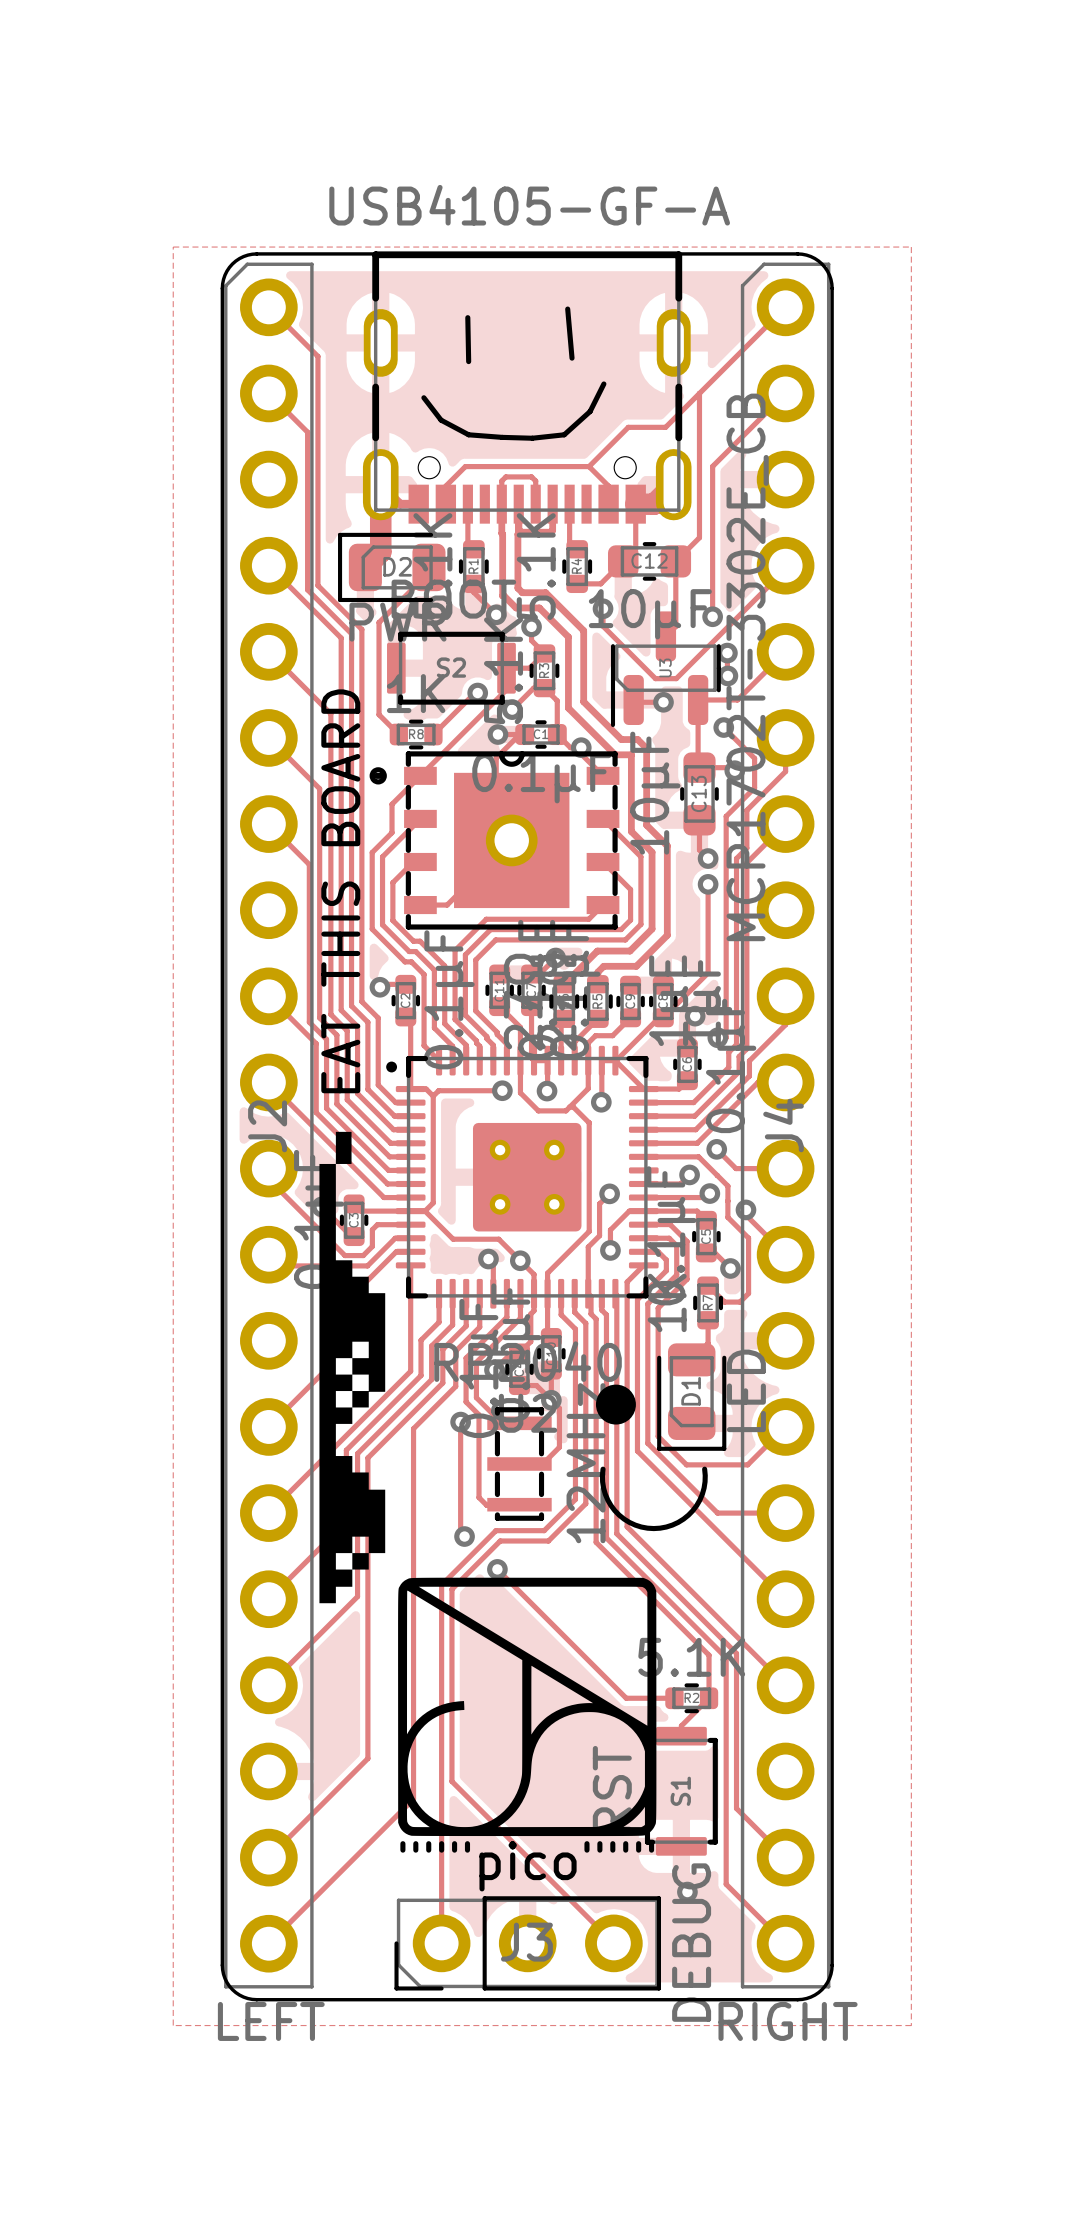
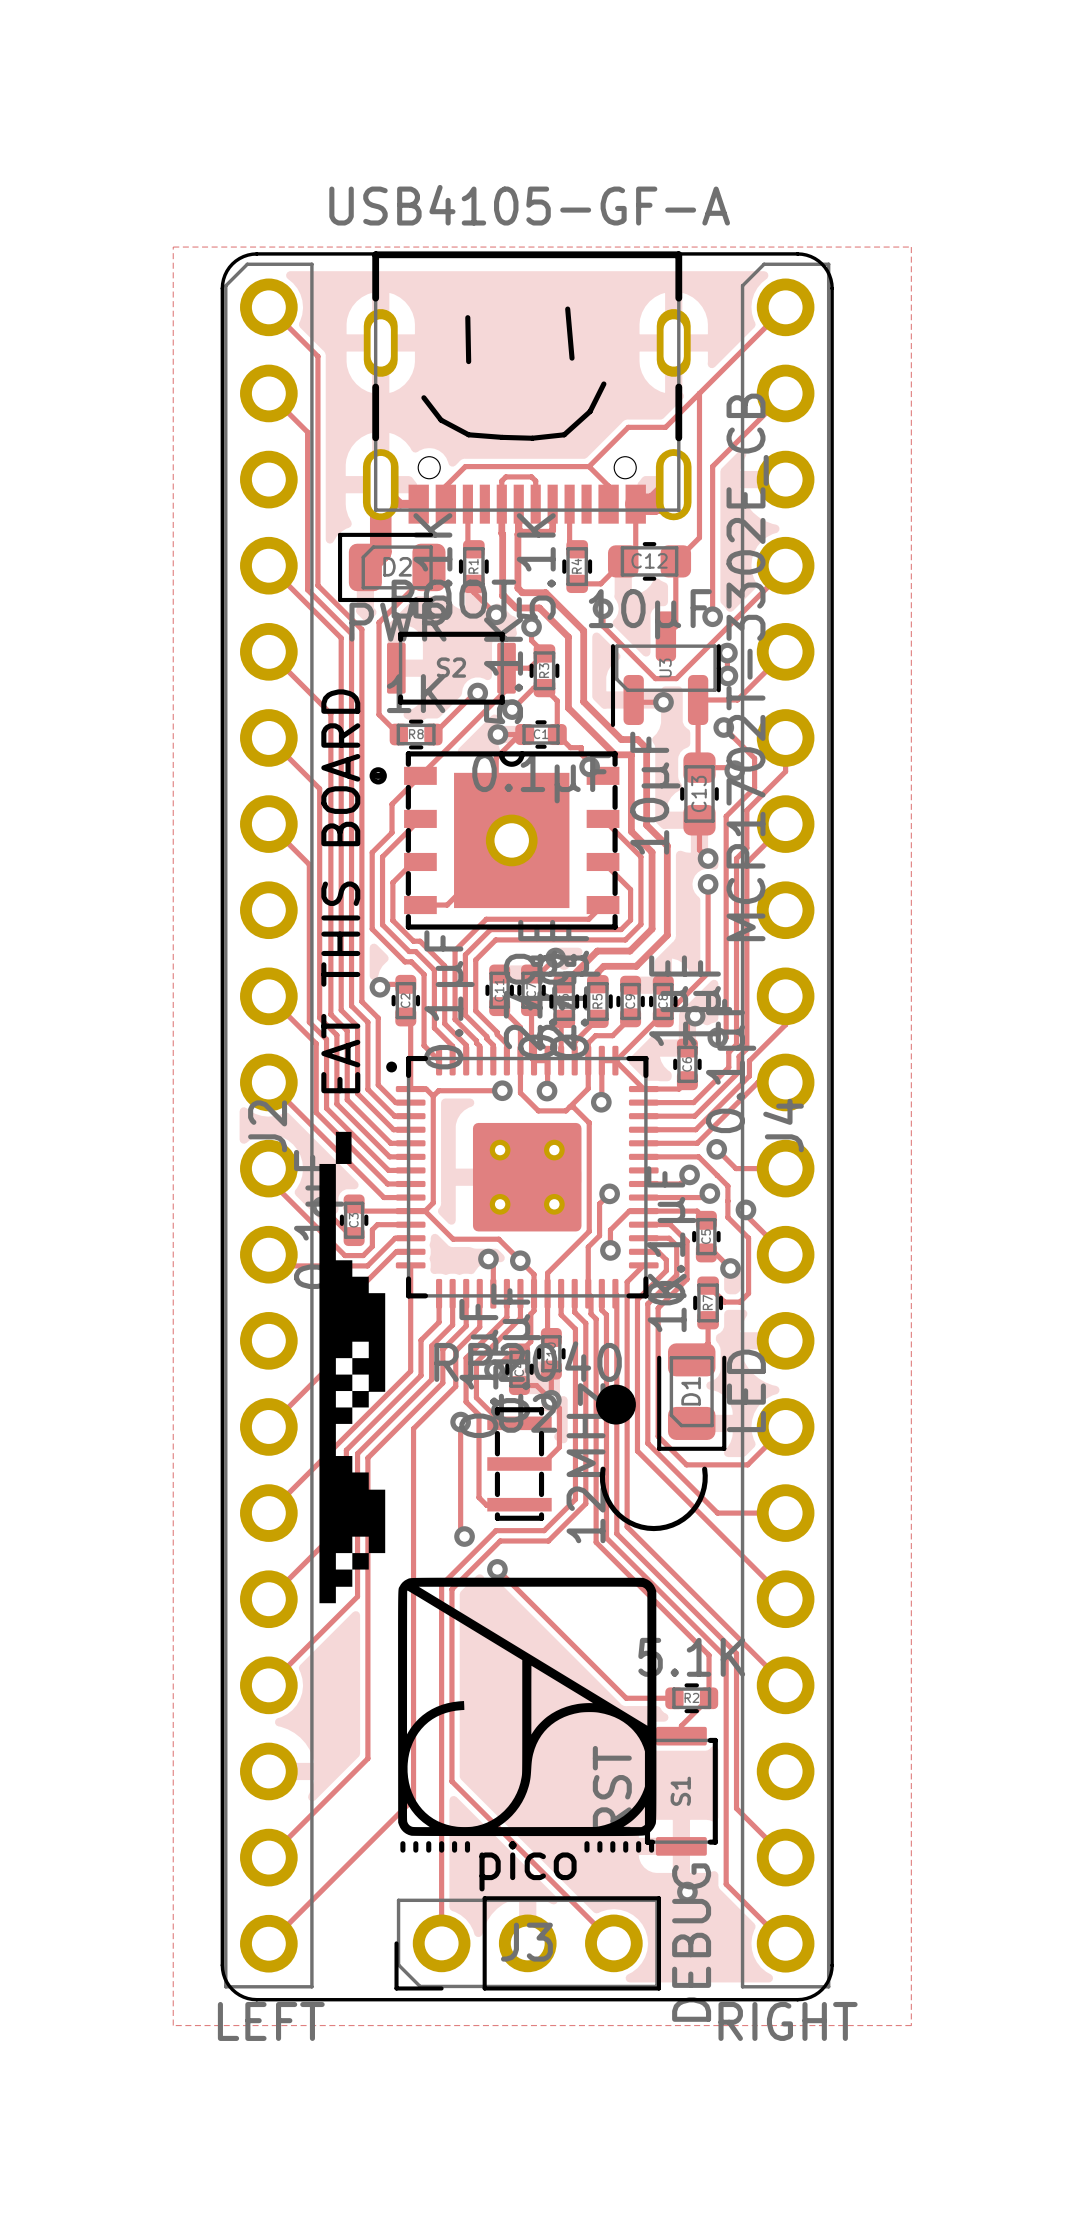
via position: (581, 747) -> (589, 766)

